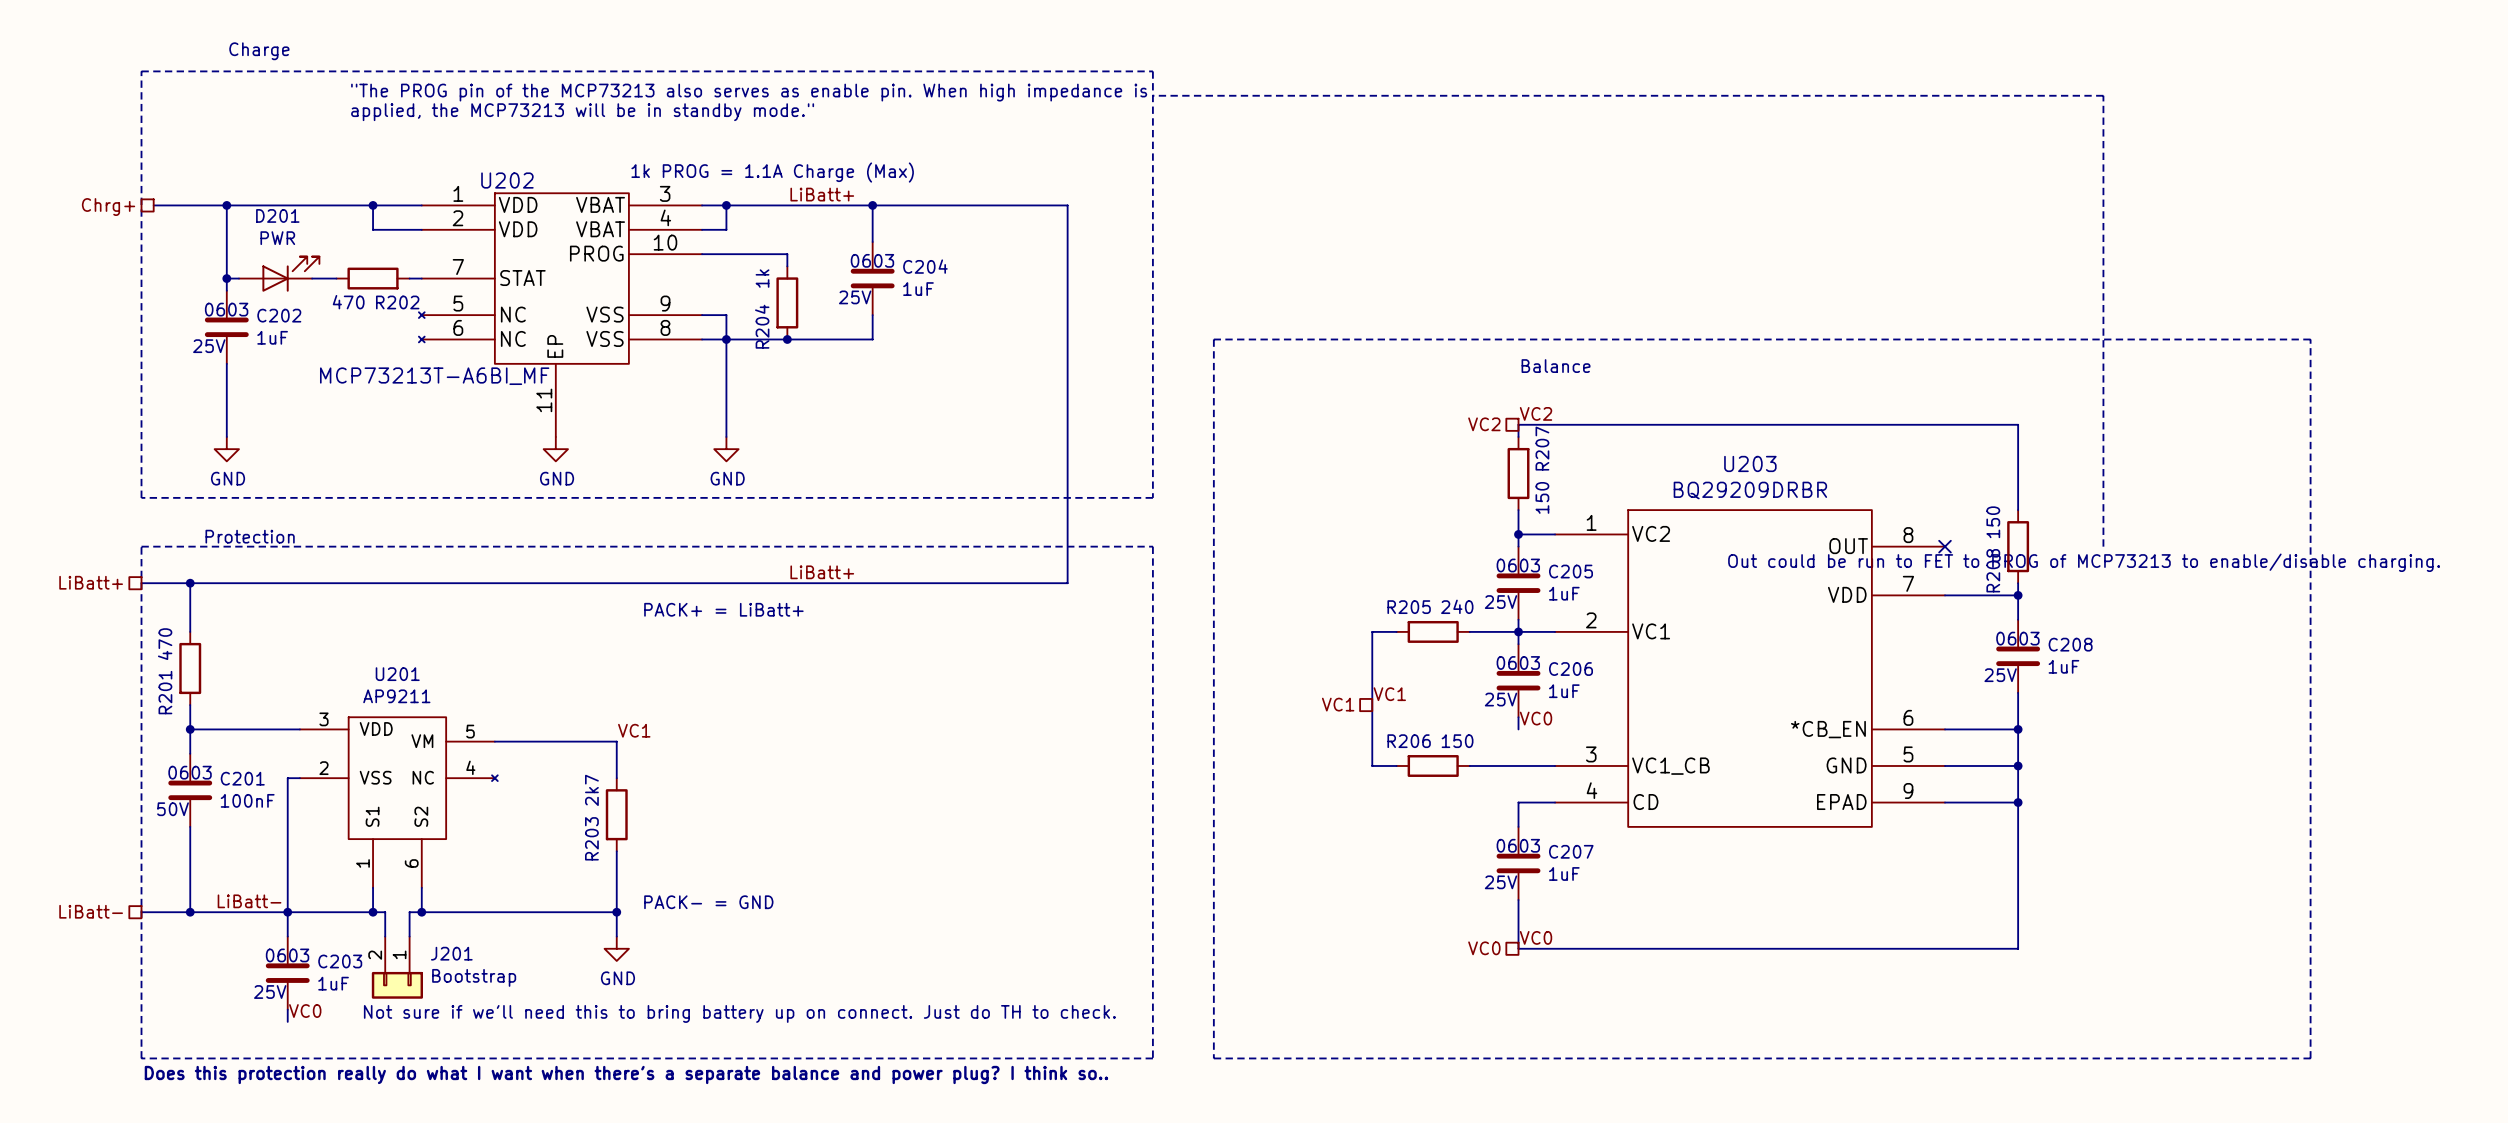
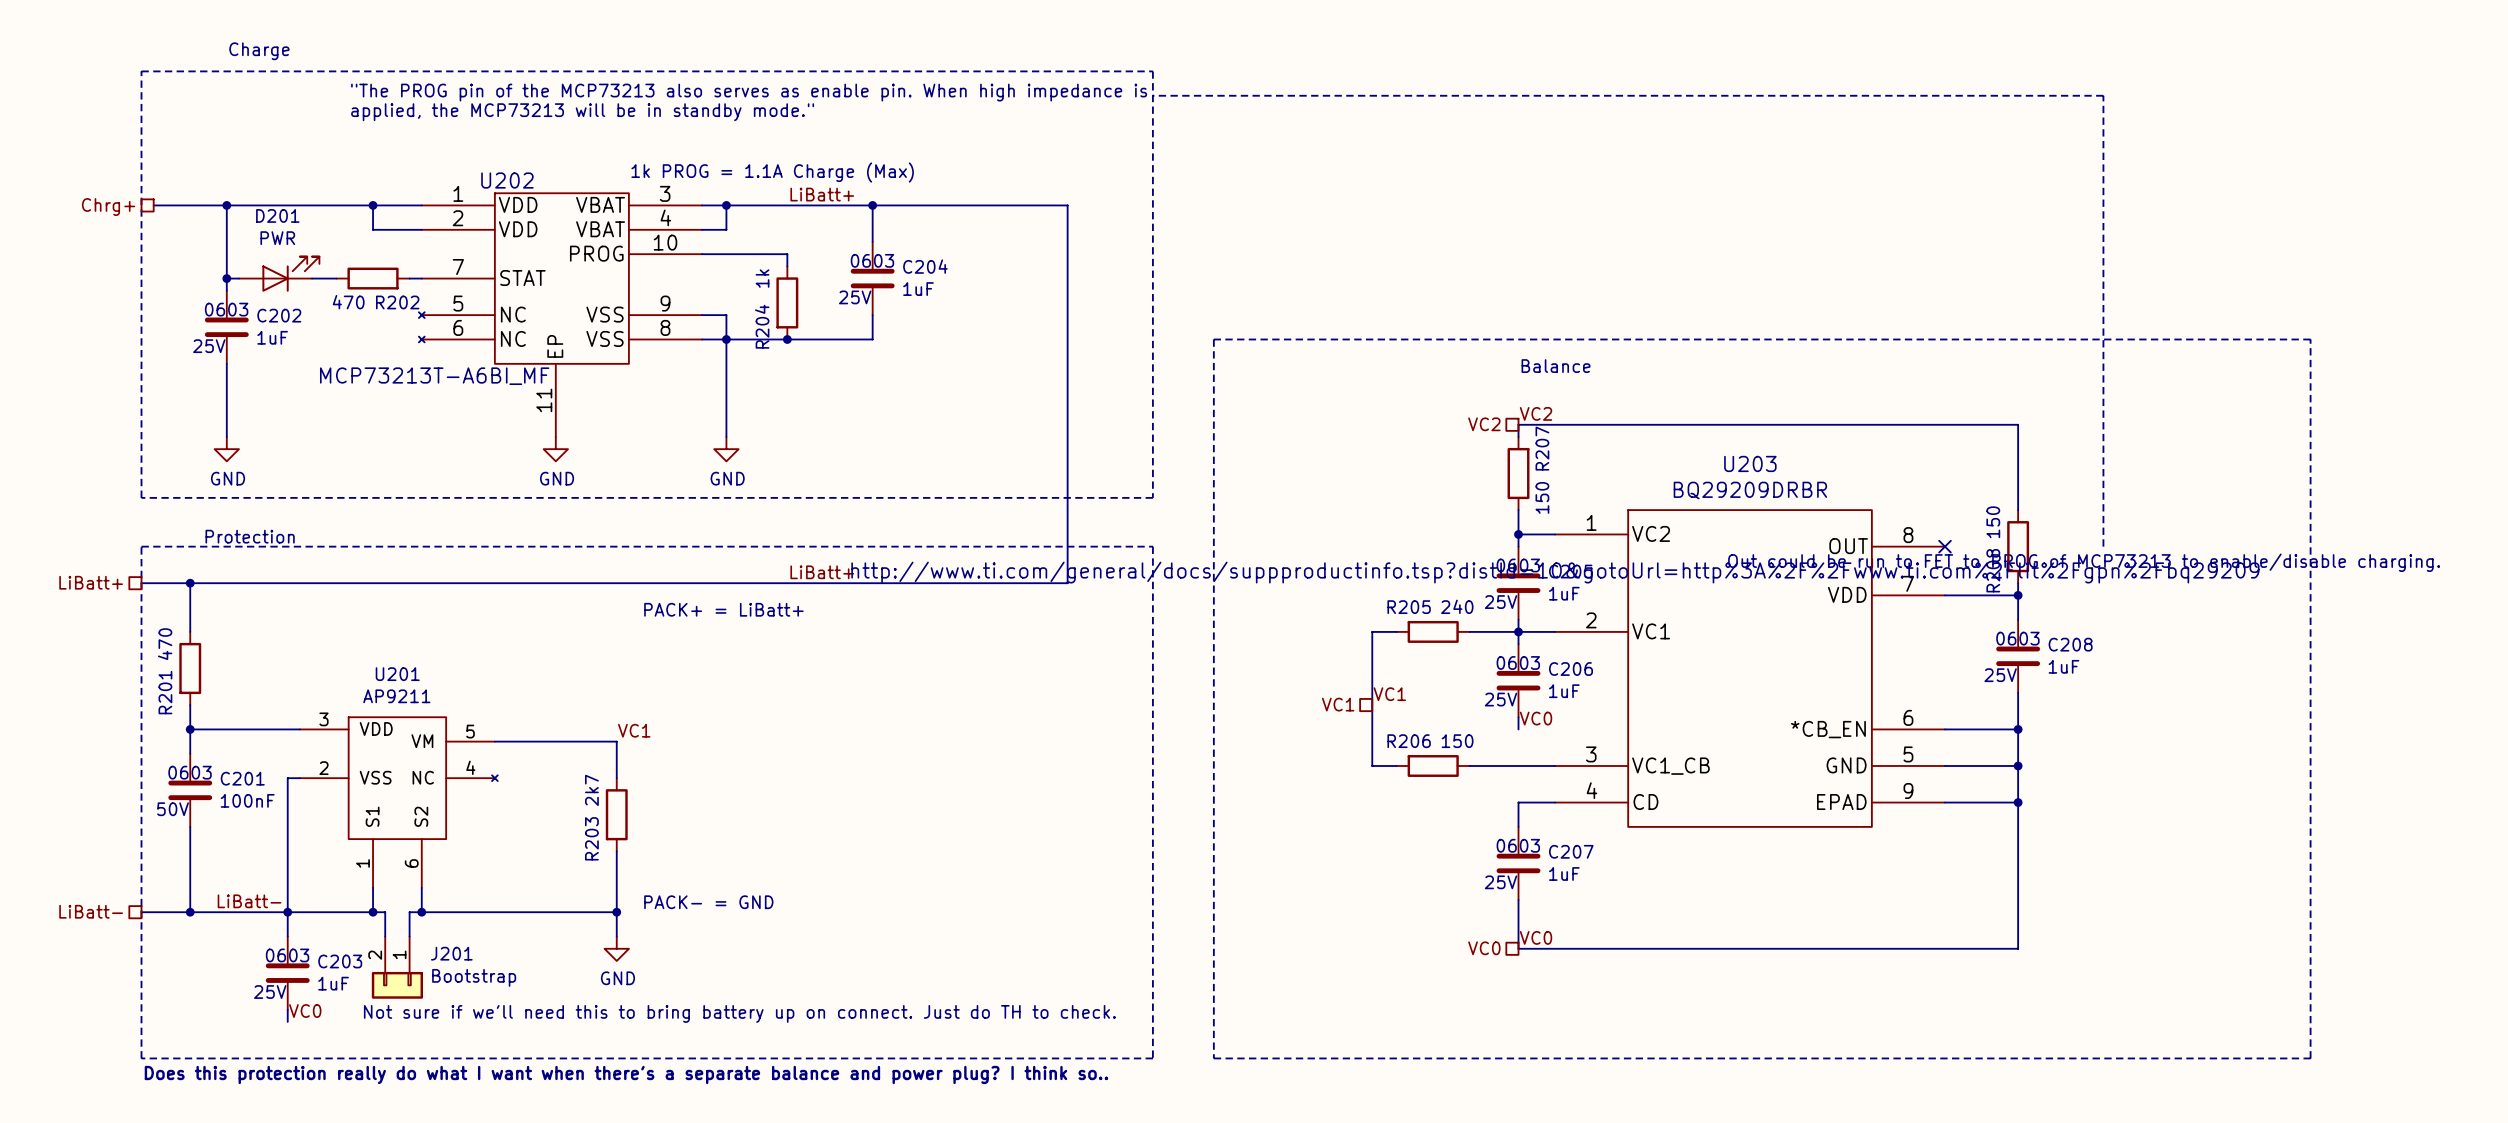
U203 text: none -> http://www.ti.com/general/docs/suppproductinfo.tsp?distId=10&gotoUrl=http%3A%2F%2Fwww.ti.com%2Flit%2Fgpn%2Fbq29209 (1555, 572)

